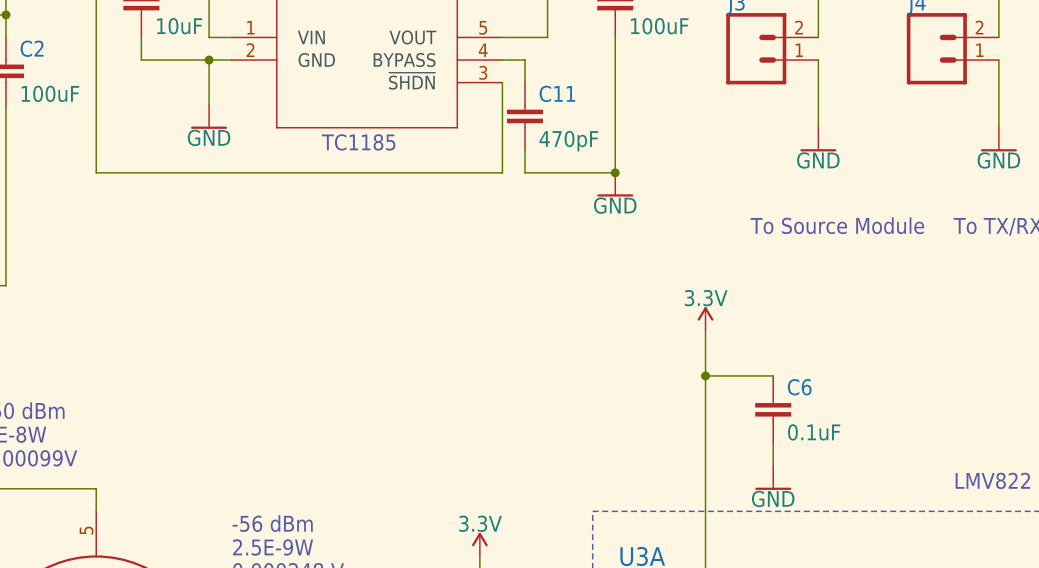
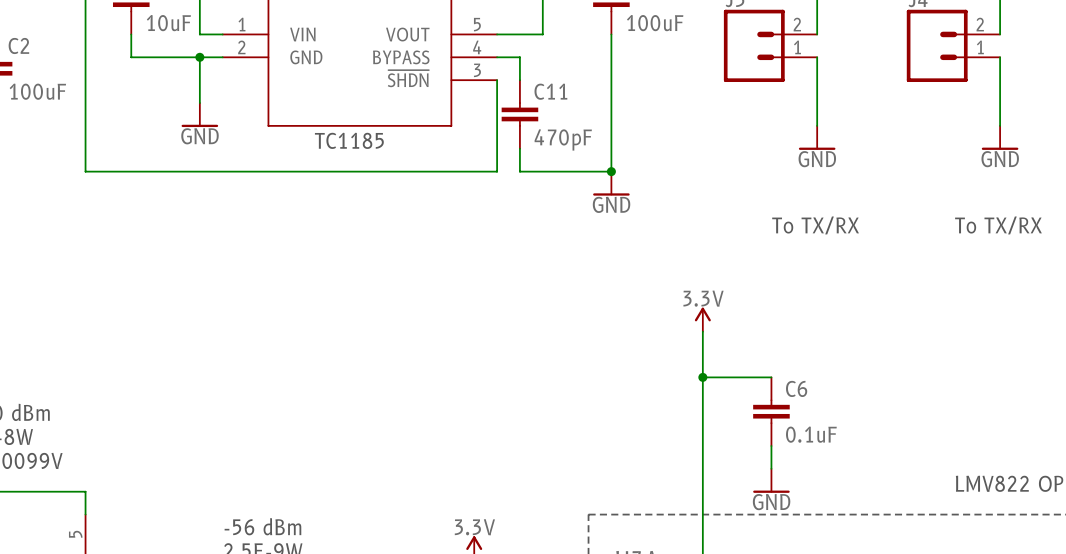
text: To Source Module (837, 225) -> none
text: none -> To TX/RX (815, 225)

